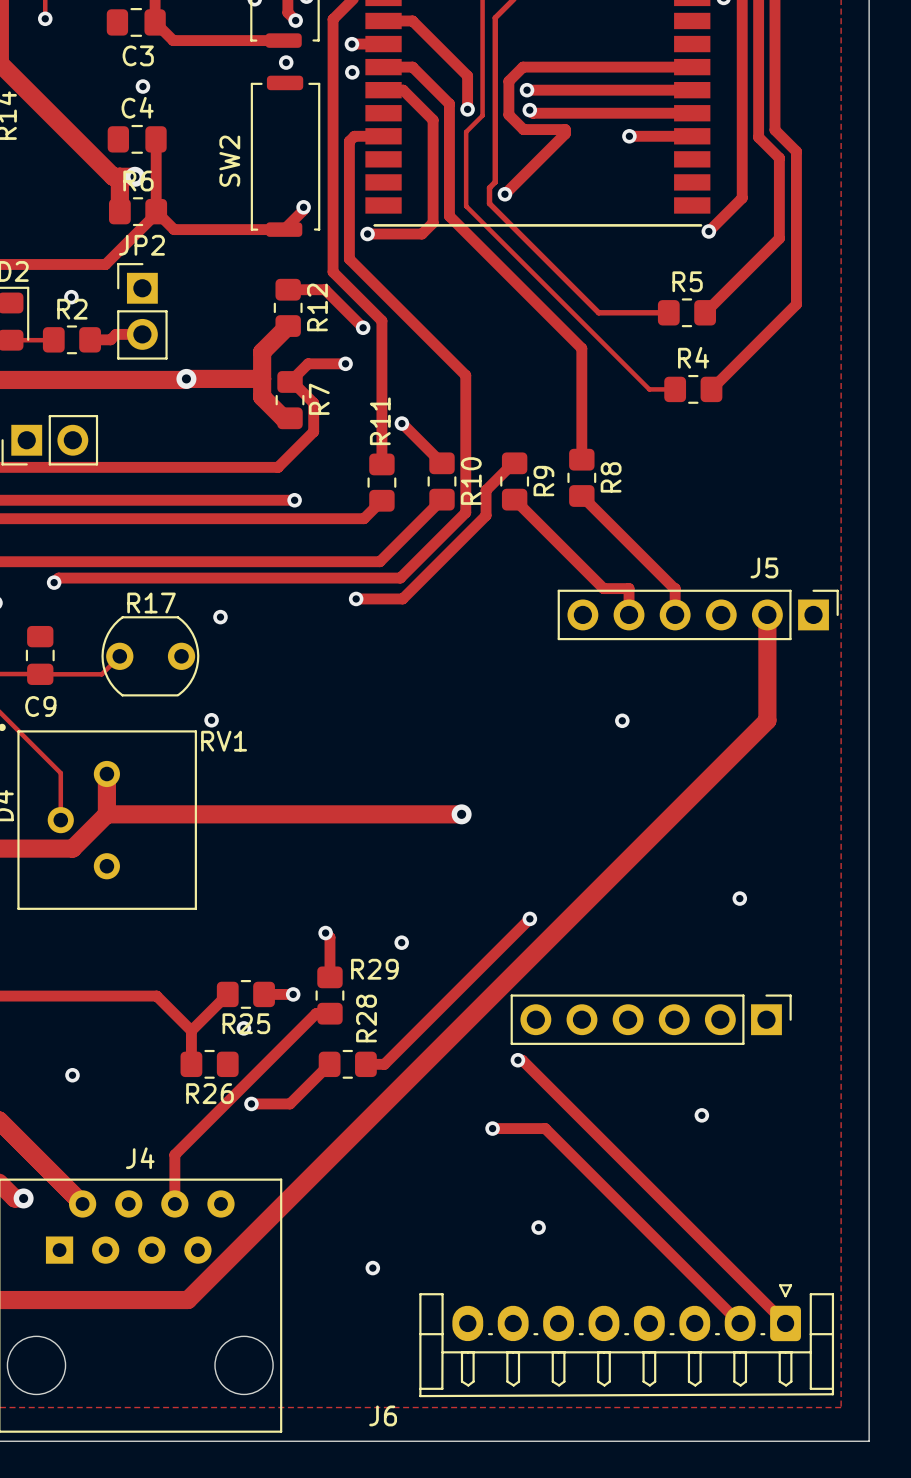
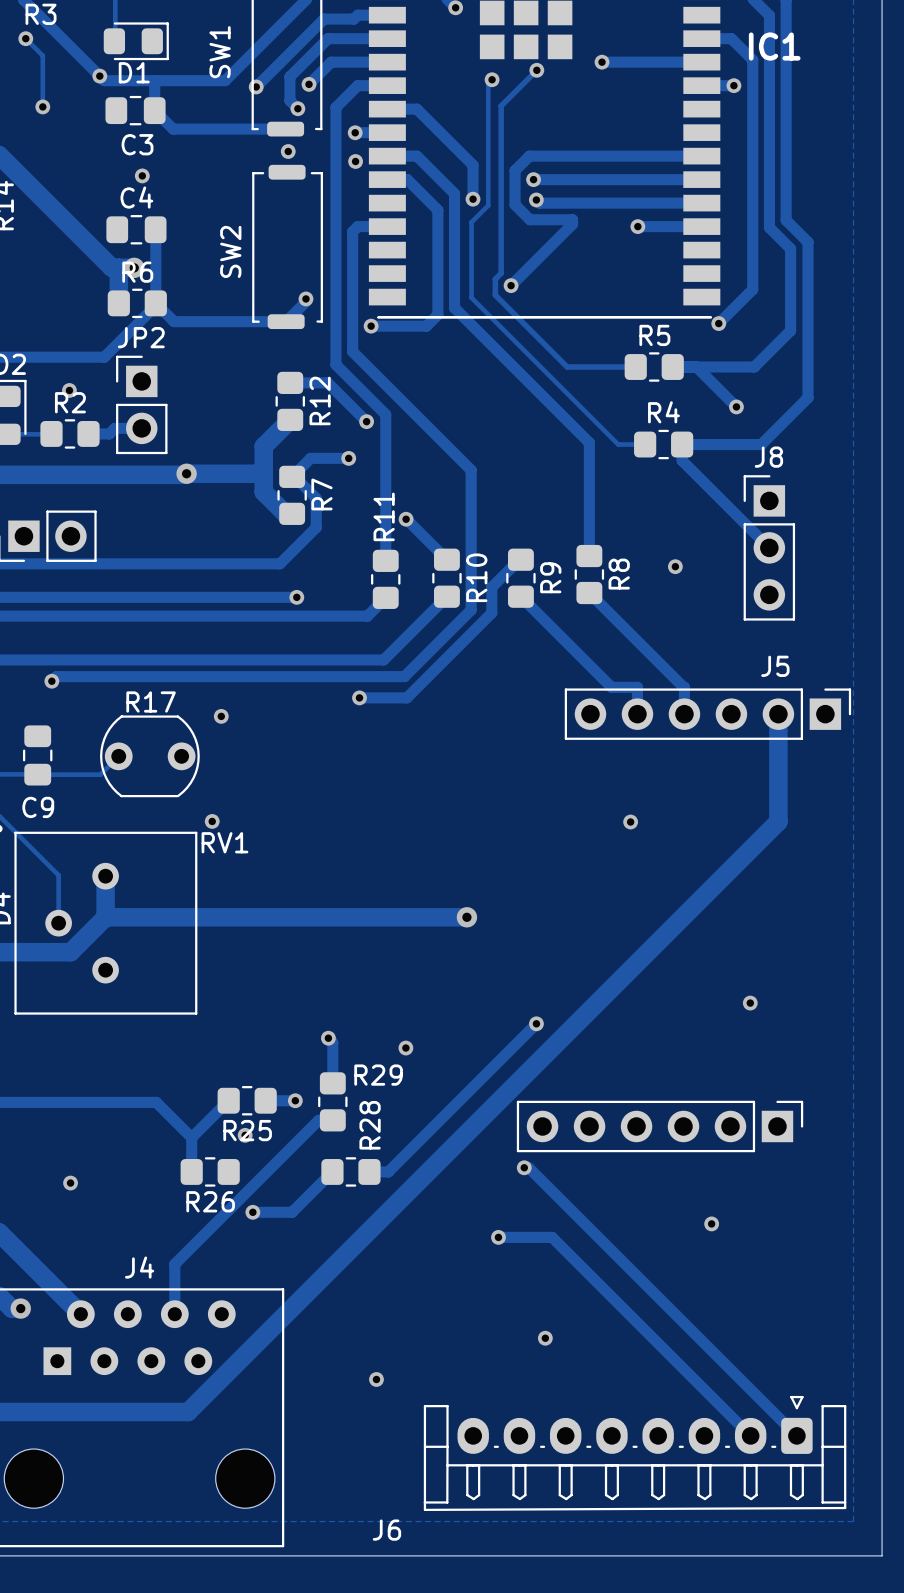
track: (560, 274) (598, 312) (668, 312) -> (567, 367) (635, 367)
track: none -> (696, 367) (736, 406)
track: (743, 274) (705, 312) -> (754, 367) (672, 367)
R5 position: (686, 312) -> (654, 367)
via: none -> (736, 406)
track: (610, 350) (649, 389) (675, 389) -> (618, 444) (645, 444)
track: (750, 350) (711, 389) -> (761, 444) (682, 444) (682, 460) (769, 547)
R4 position: (693, 389) -> (663, 444)
J8: none -> (769, 547)
via: none -> (675, 566)

